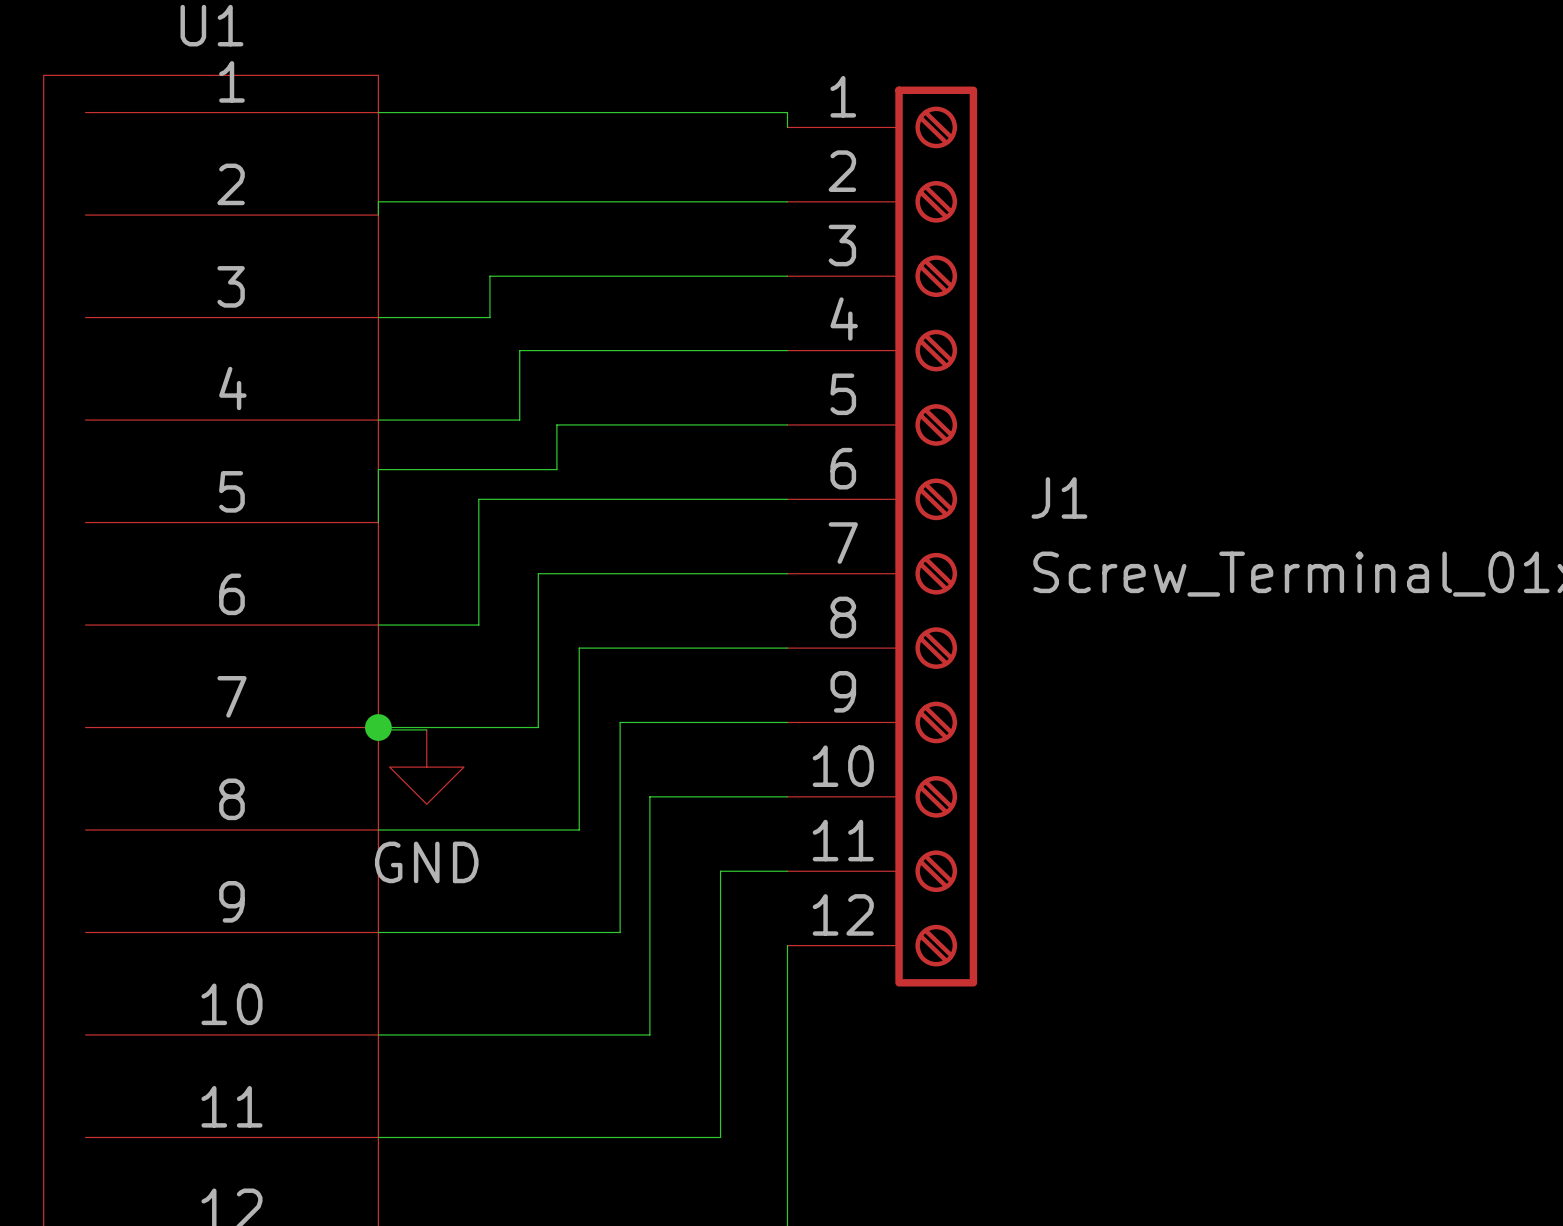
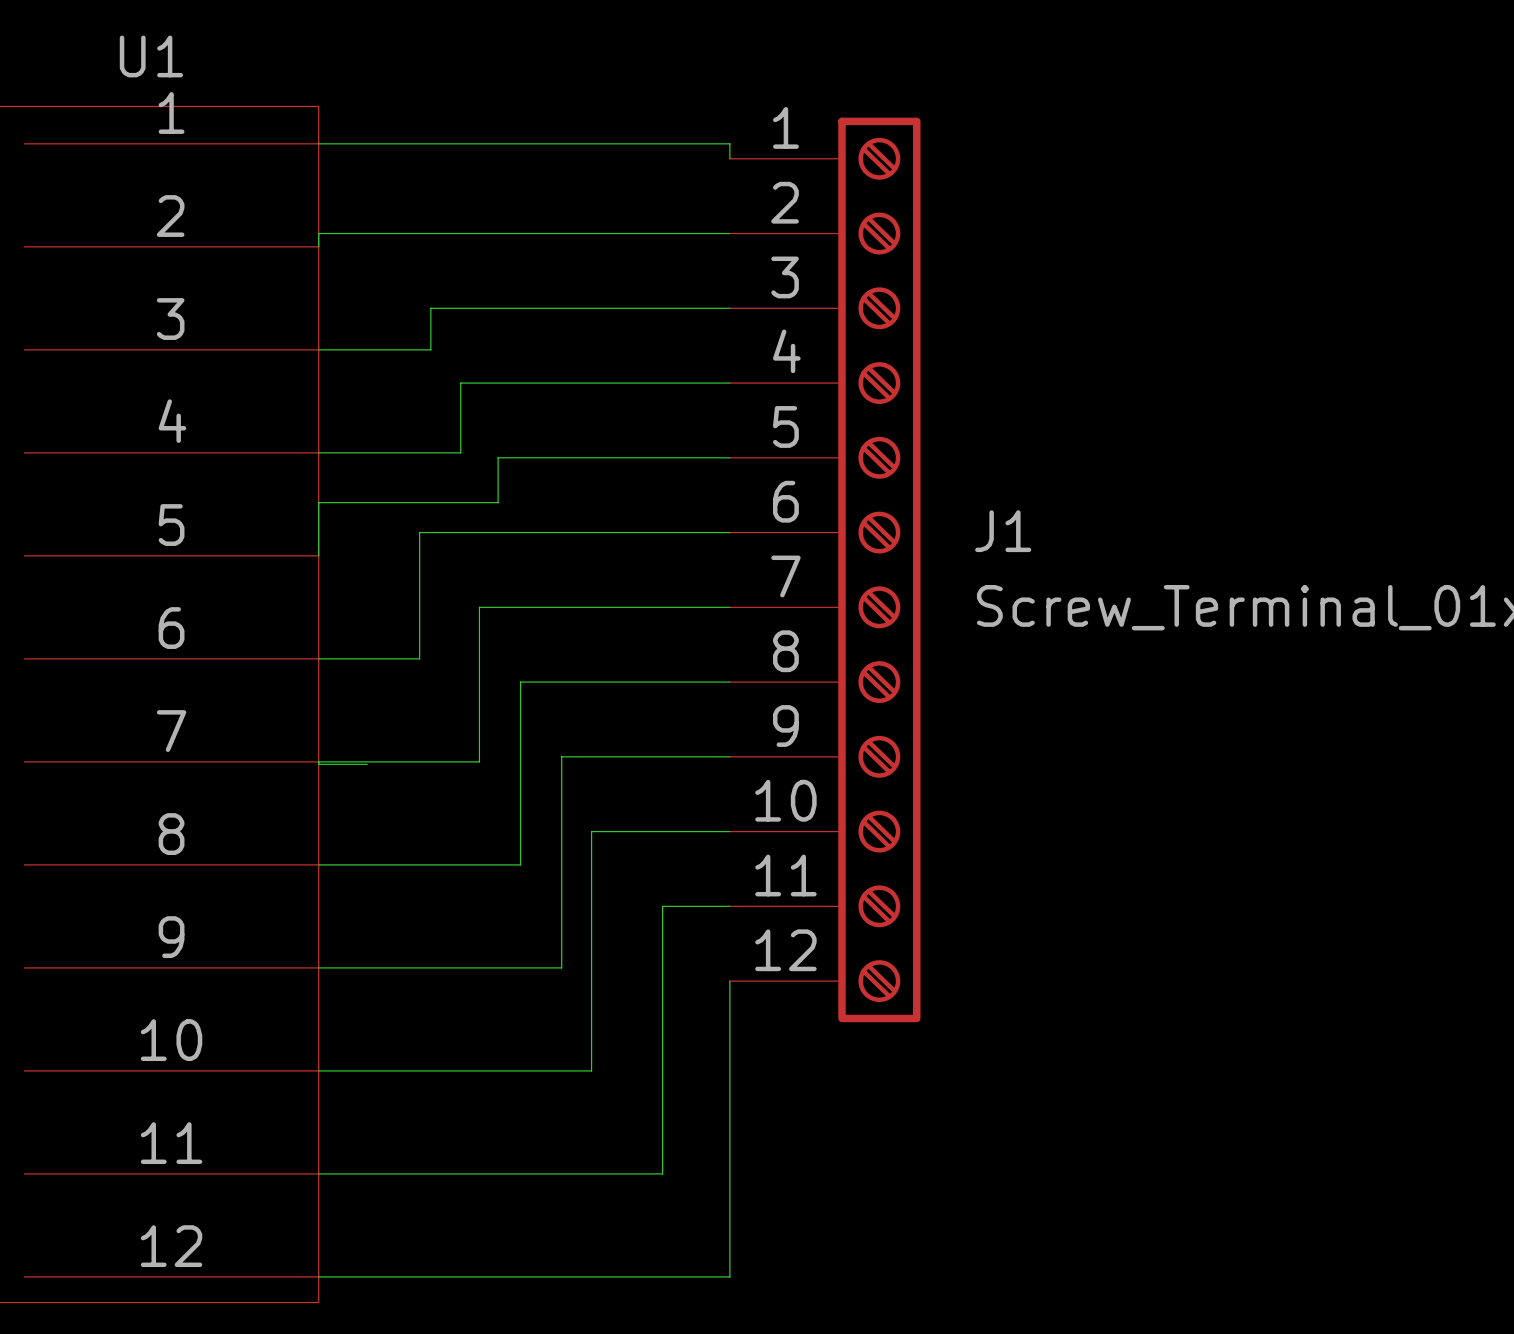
junction: (378, 727) -> none
power symbol: GND (426, 767) -> none

